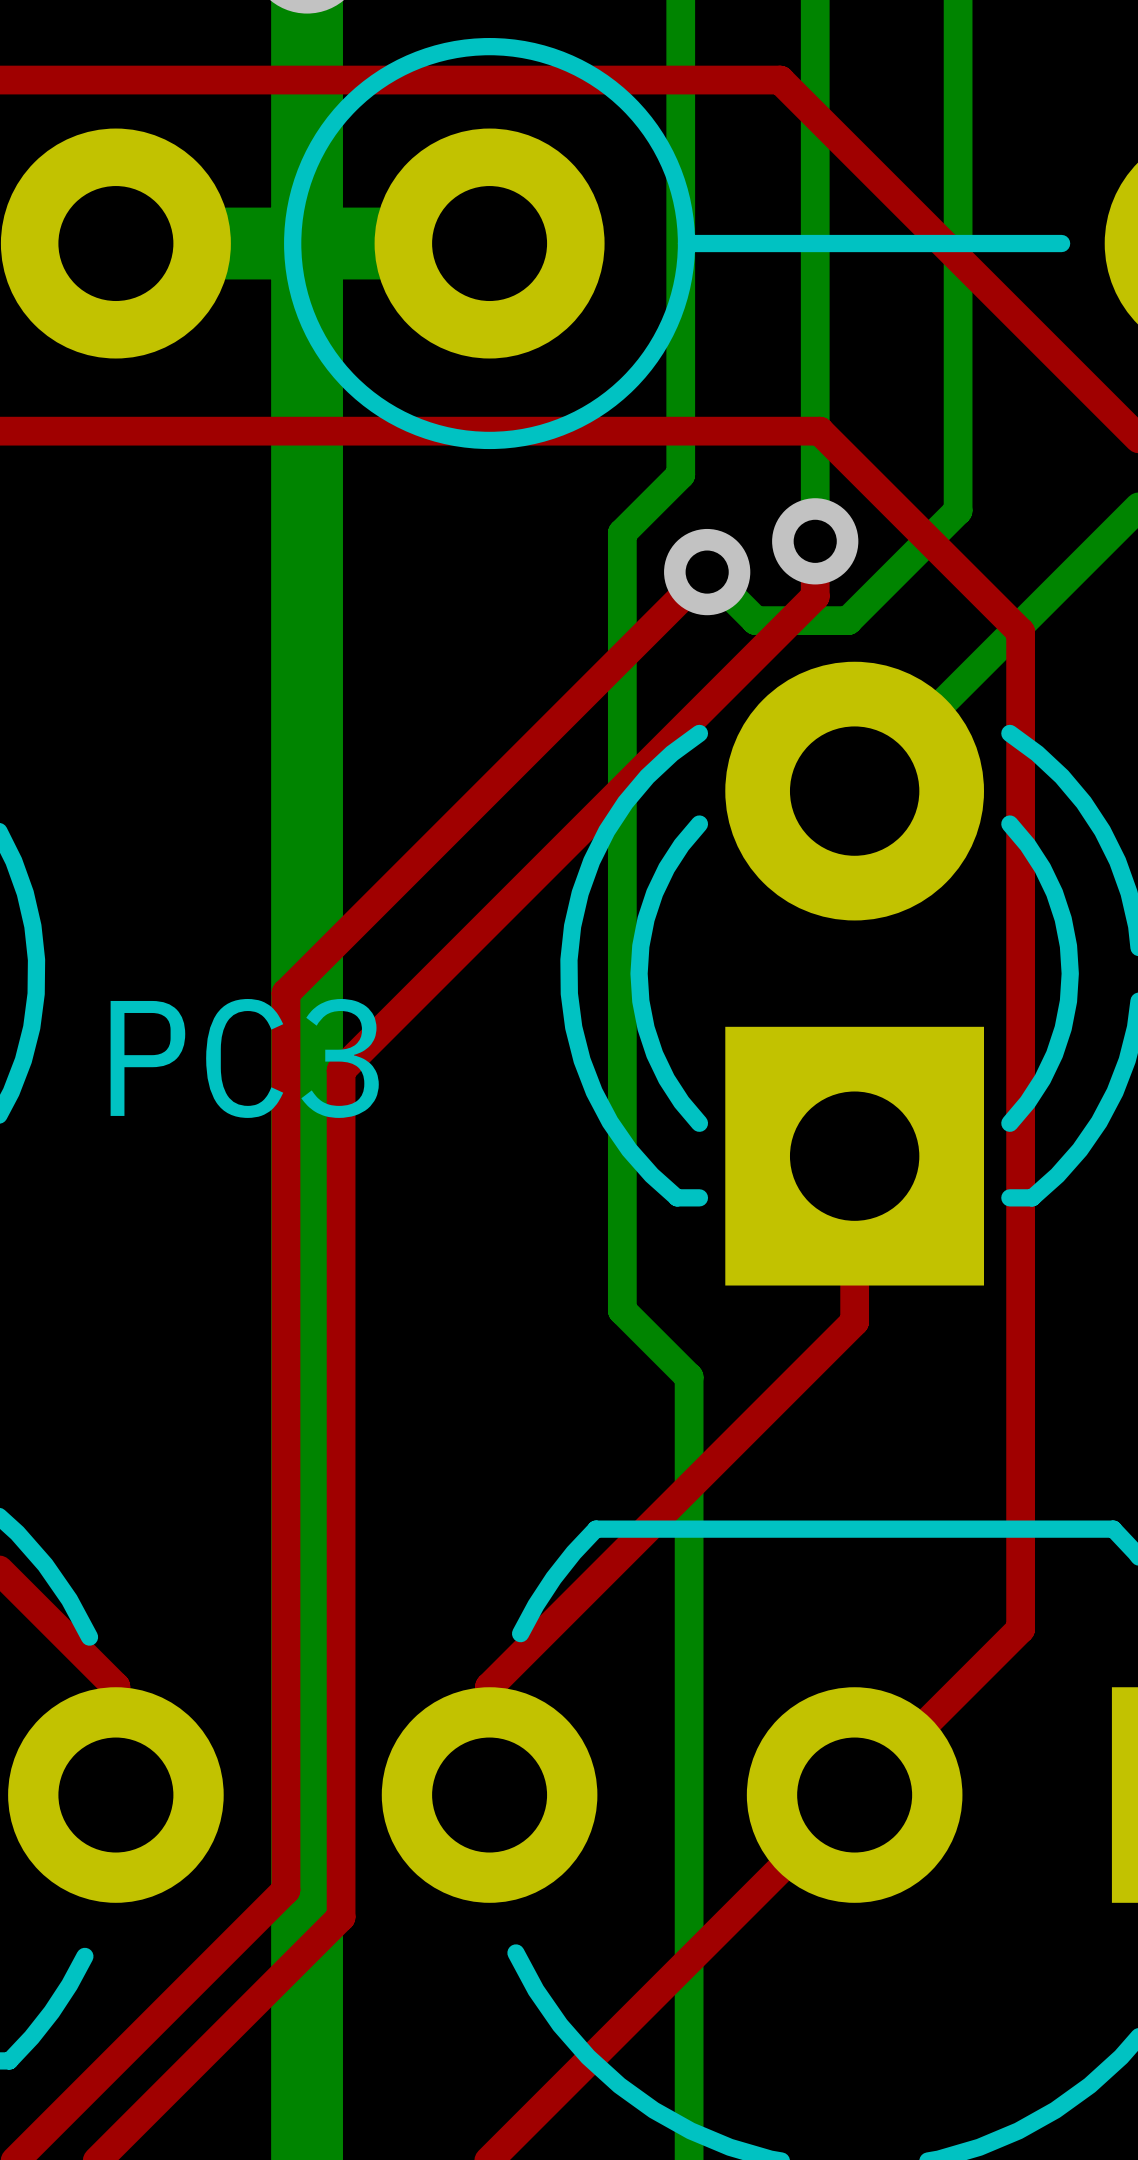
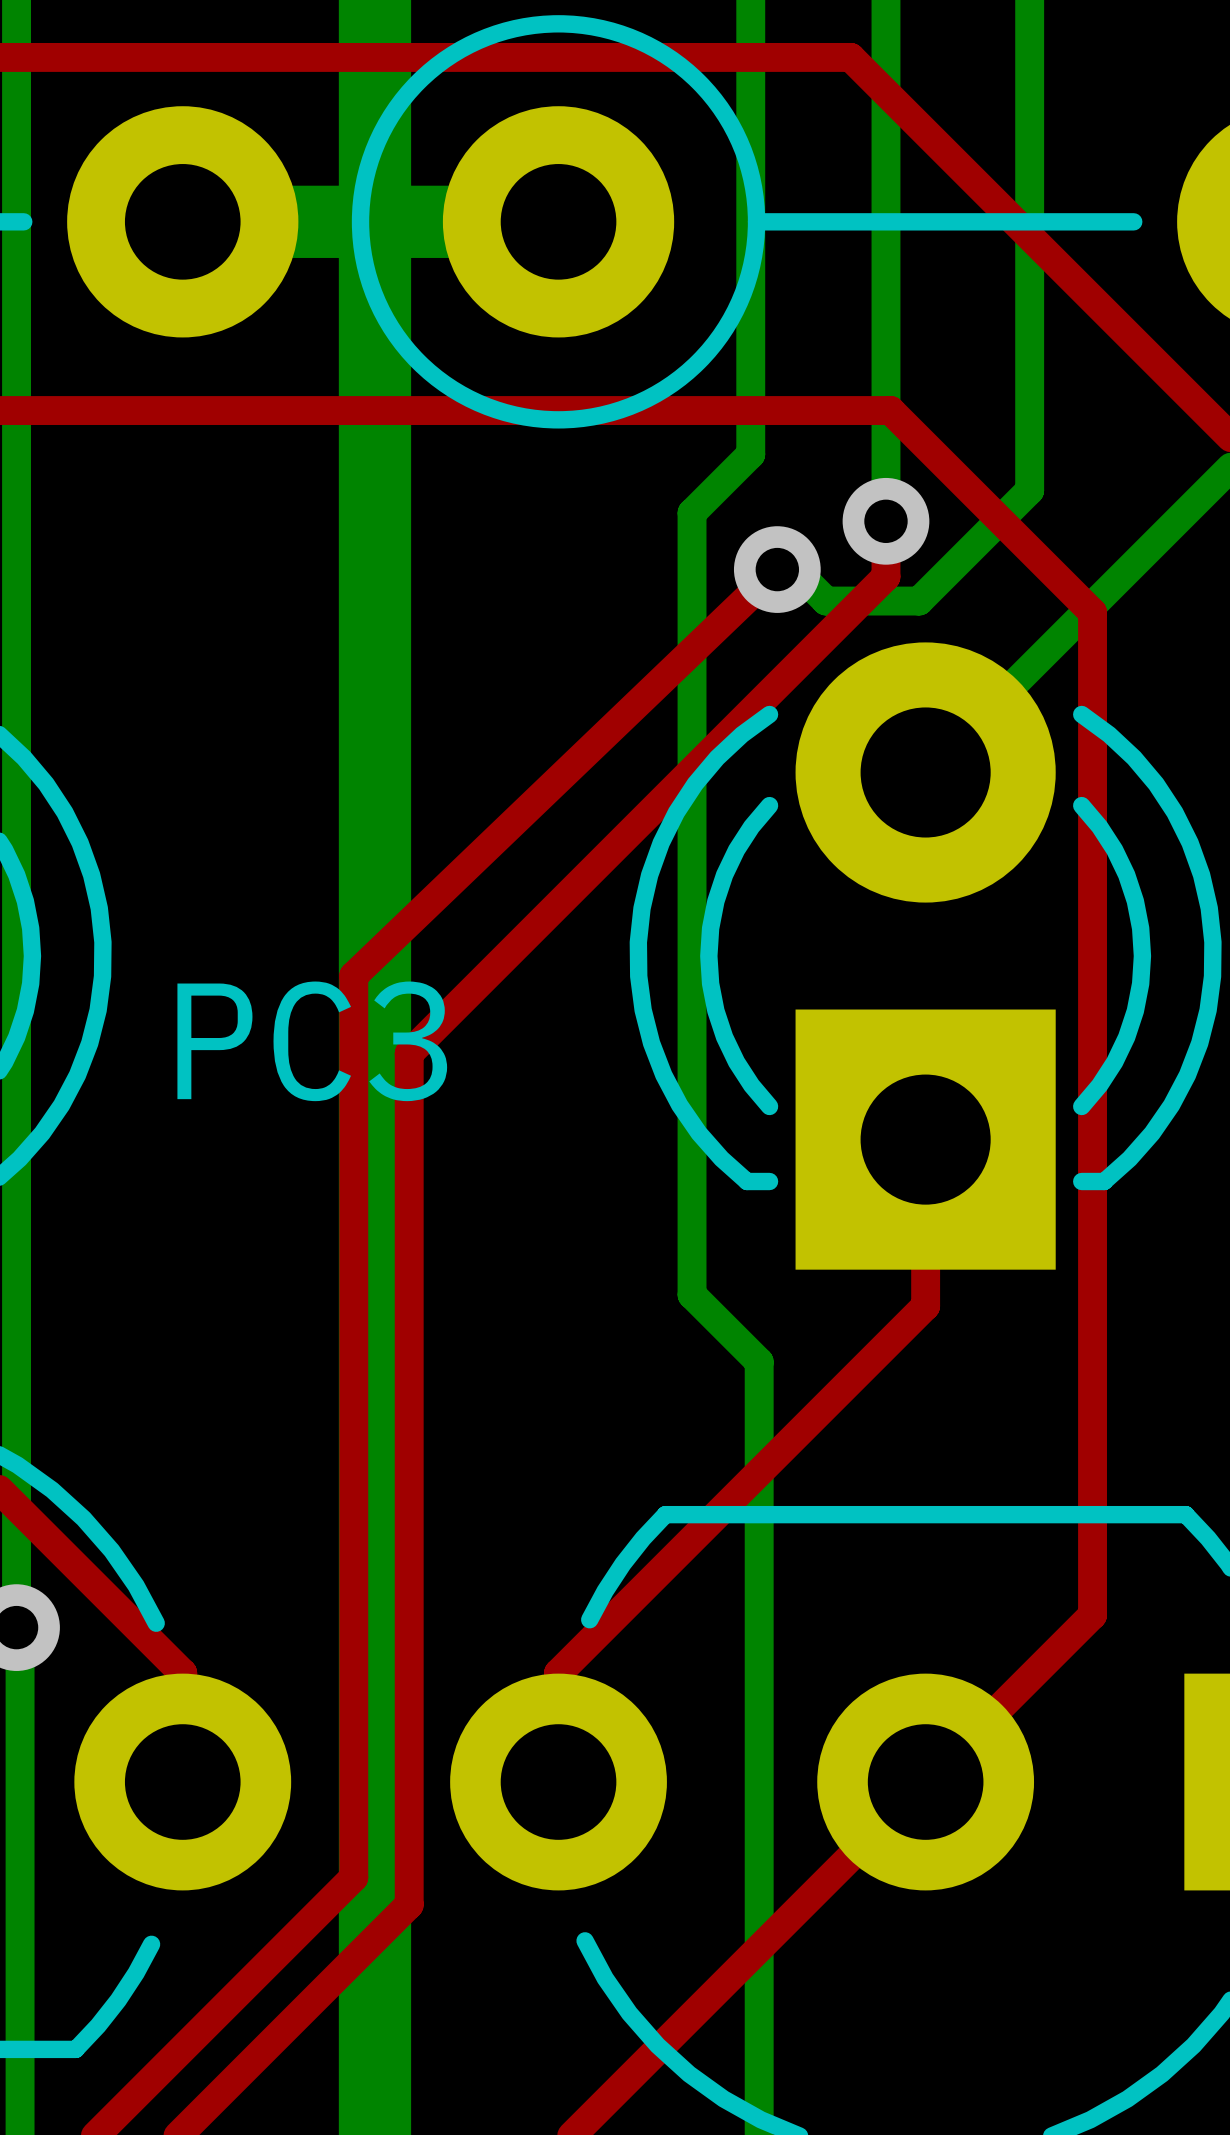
top track: (707, 572) (285, 993) -> (777, 569) (353, 975)
via position: (707, 572) -> (777, 569)

